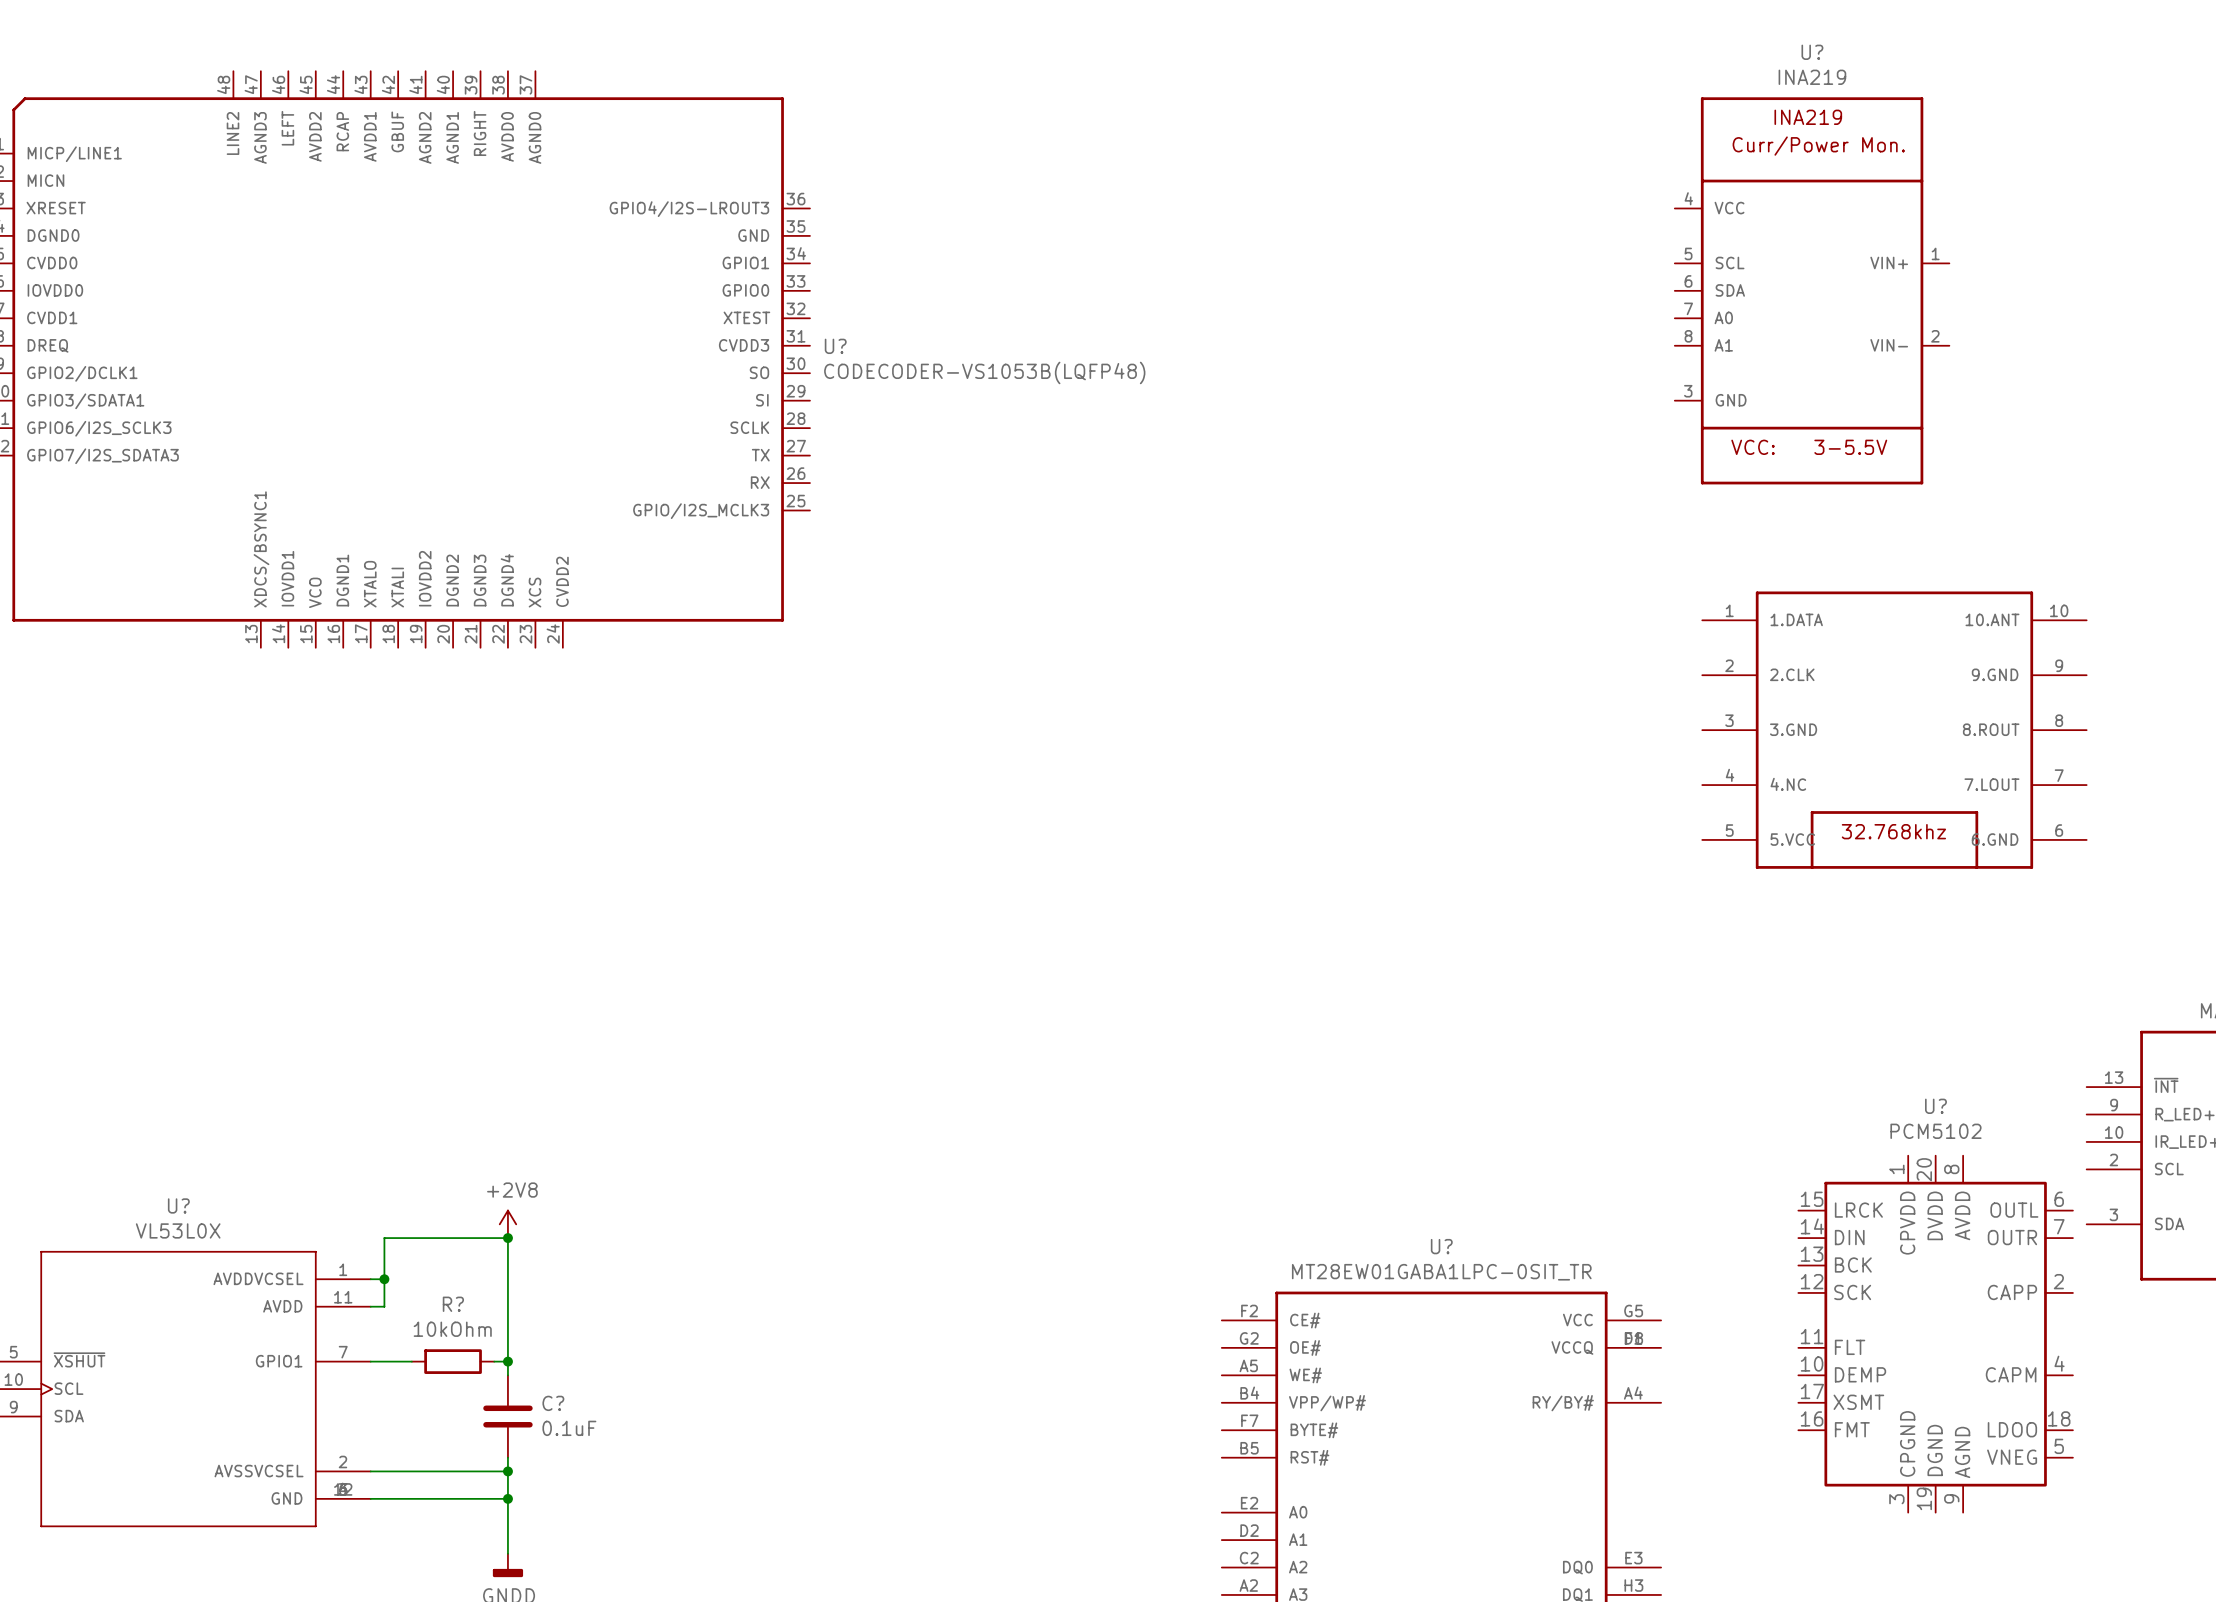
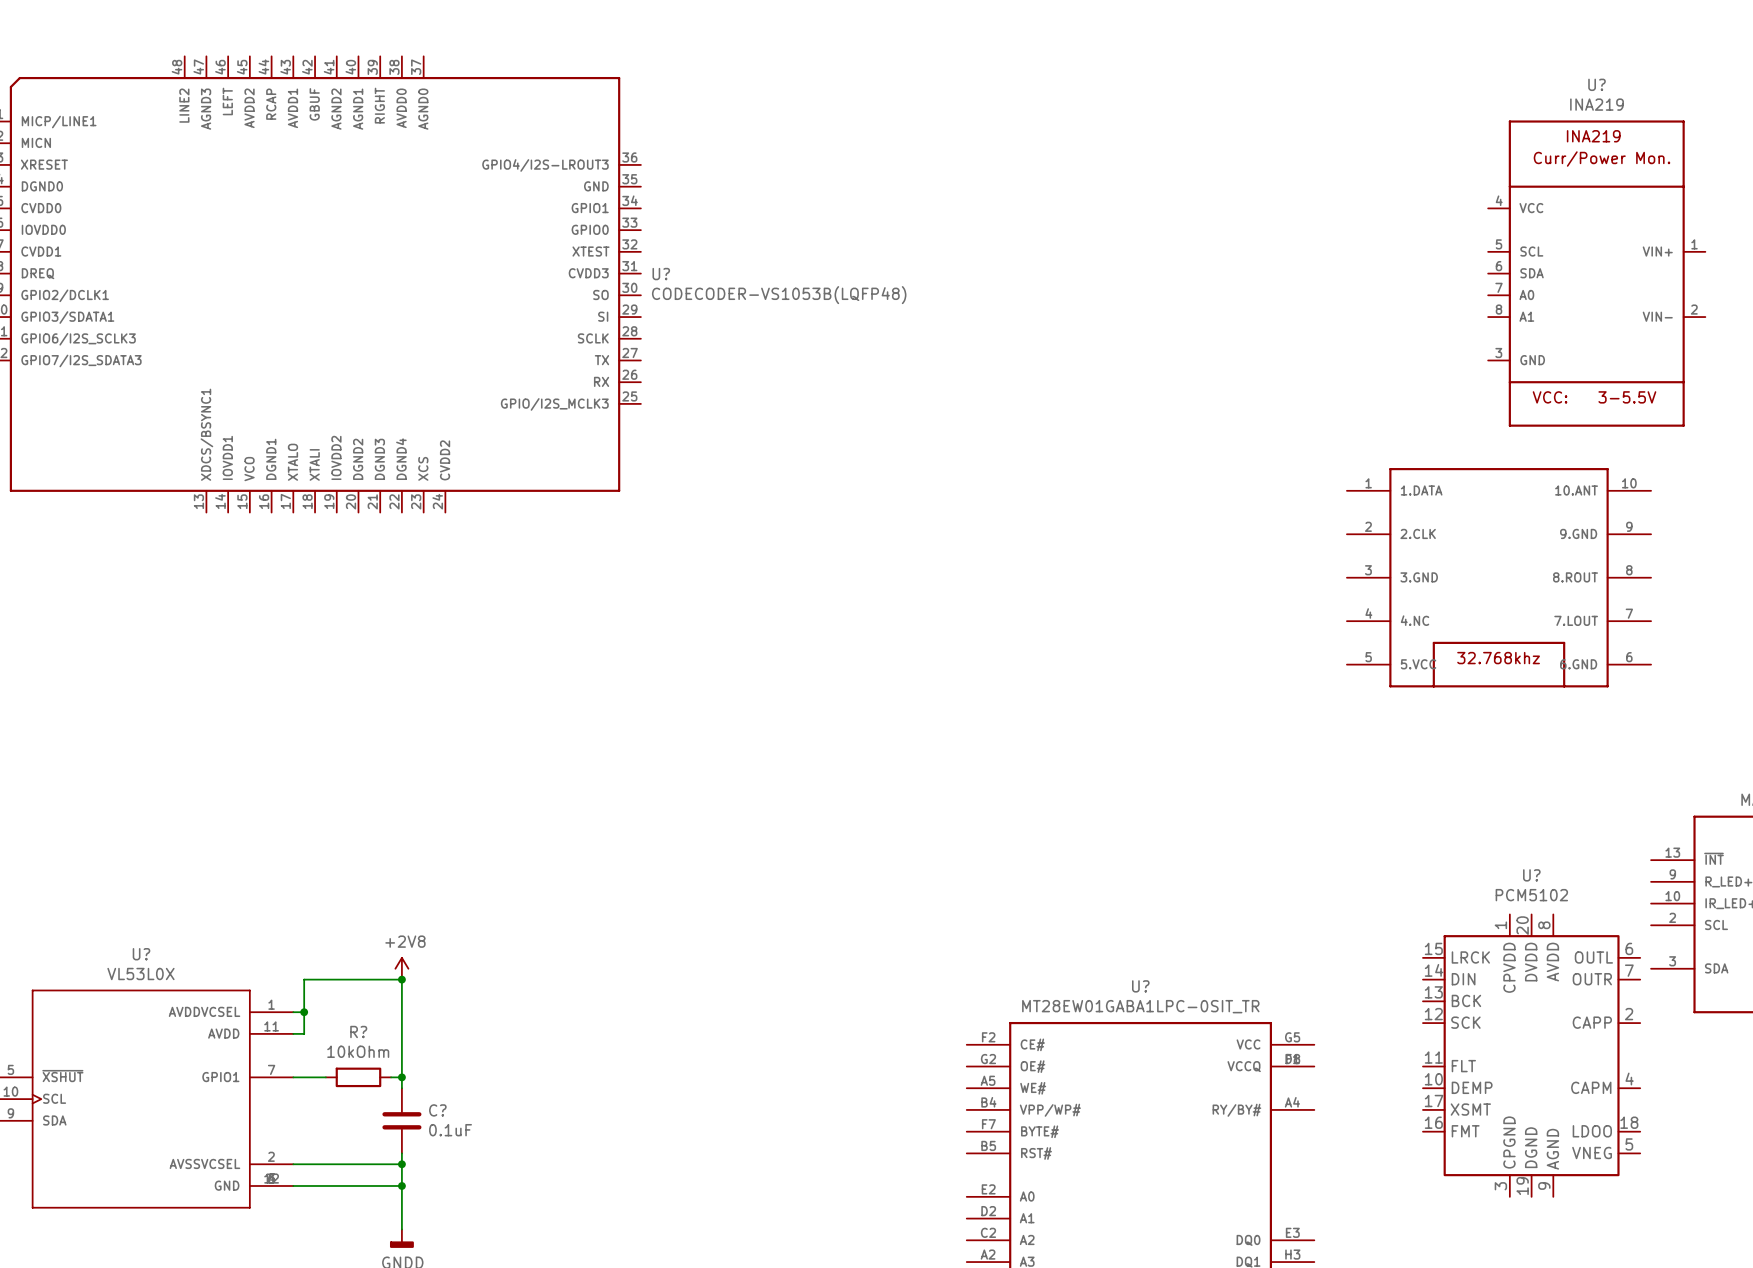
U? position: (1812, 290) -> (1596, 273)

